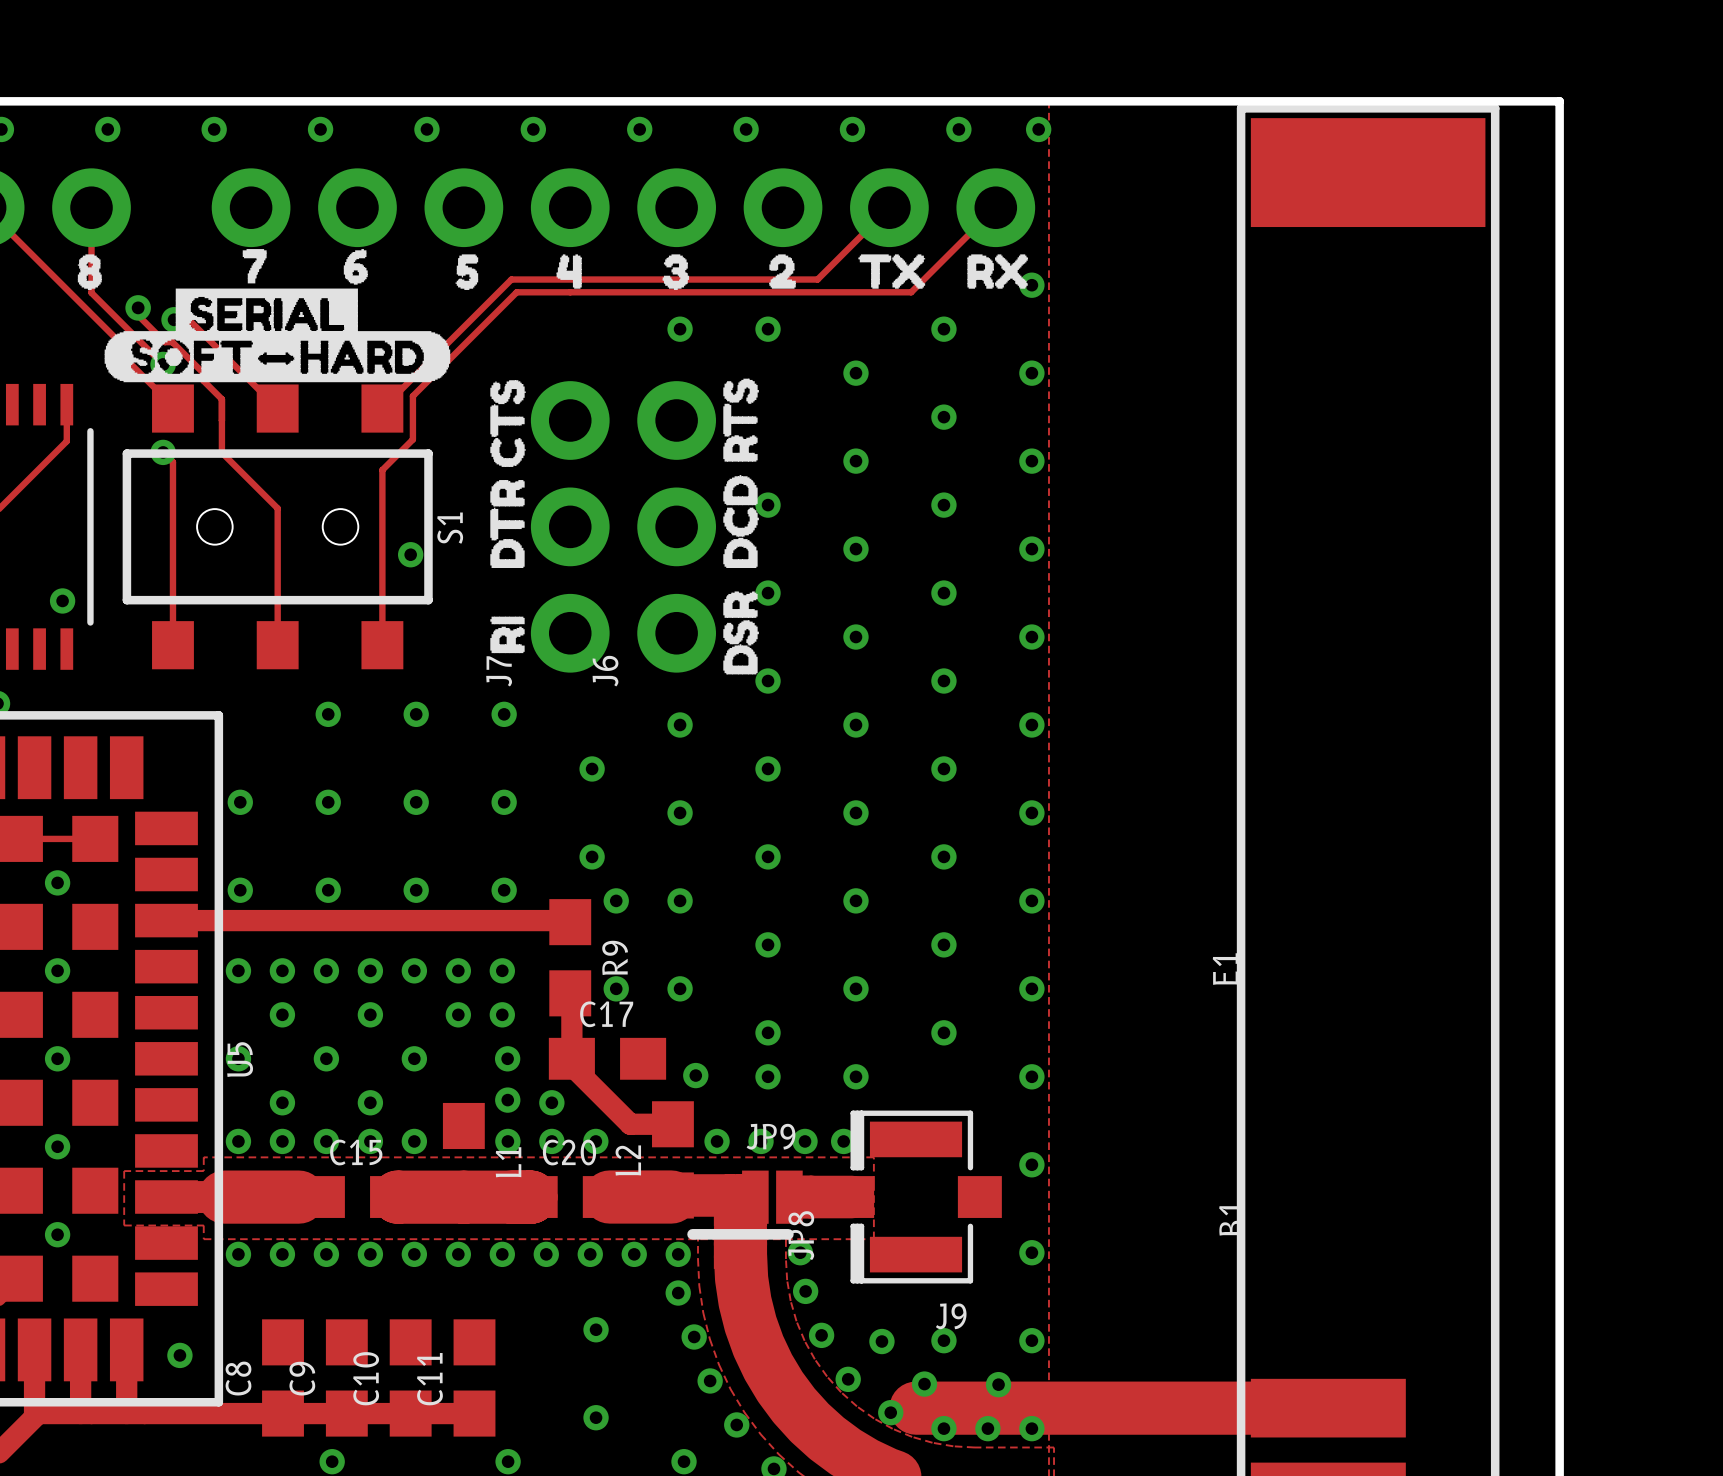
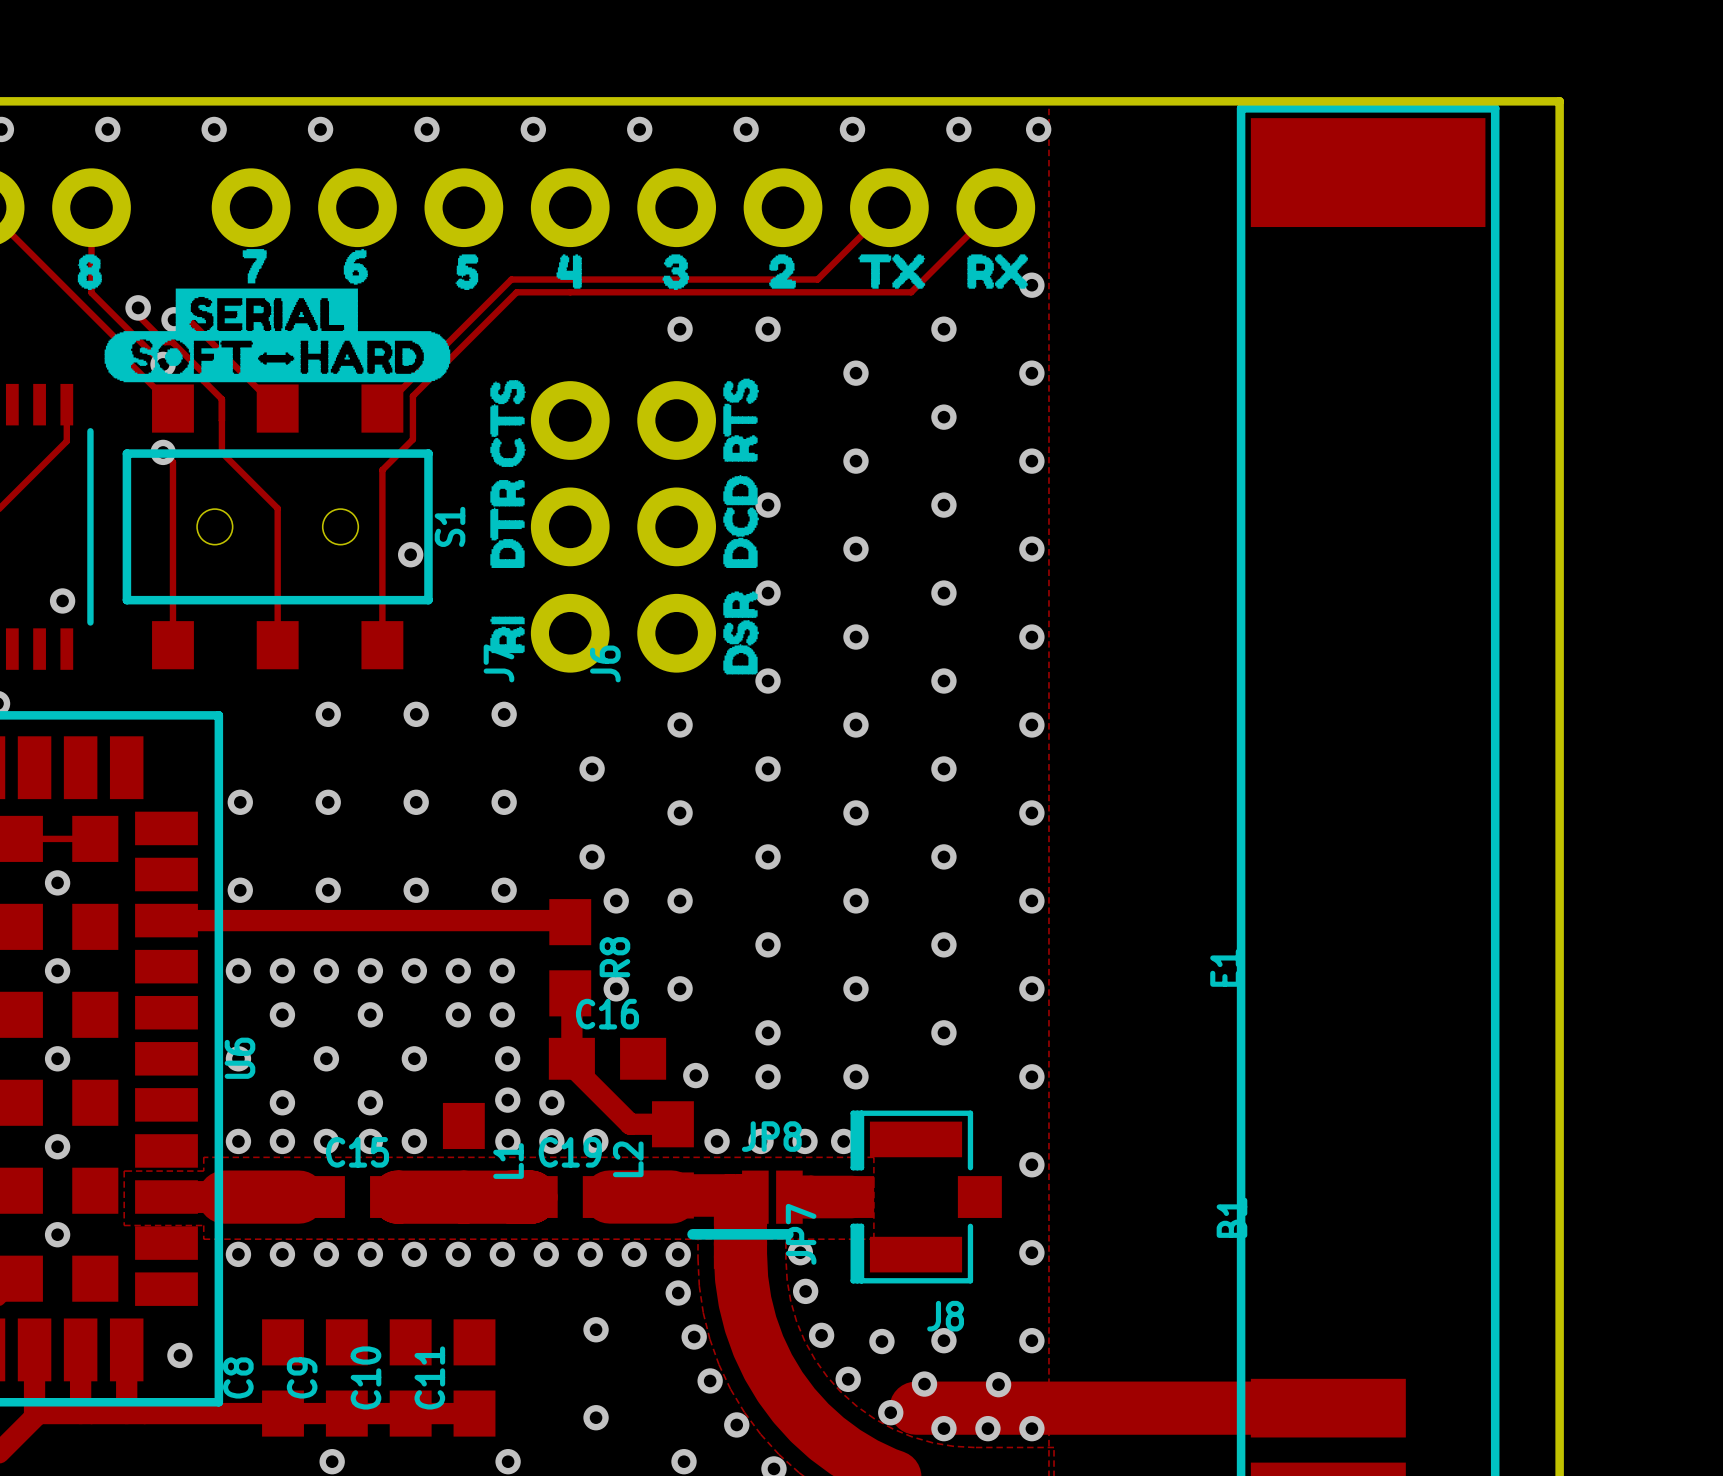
R9 name: R9 (615, 957) -> R8 (614, 957)
C17 name: C17 (606, 1014) -> C16 (607, 1014)
U5 name: U5 (240, 1059) -> U6 (239, 1058)
JP9 name: JP9 (771, 1136) -> JP8 (771, 1136)
C20 name: C20 (569, 1152) -> C19 (570, 1152)
JP8 name: JP8 (801, 1235) -> JP7 (801, 1234)
J9 name: J9 (951, 1316) -> J8 (945, 1316)

